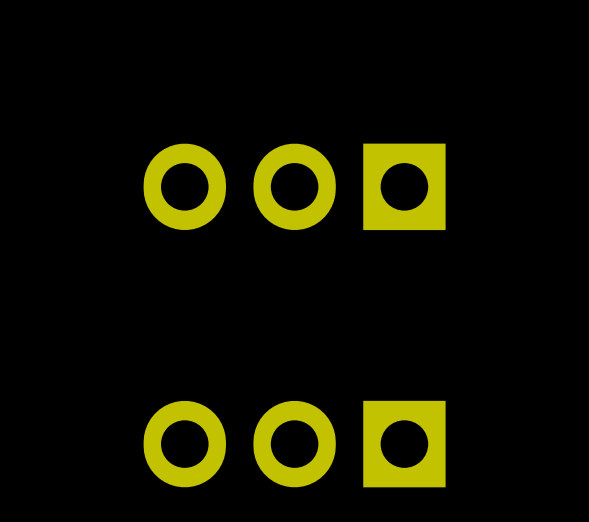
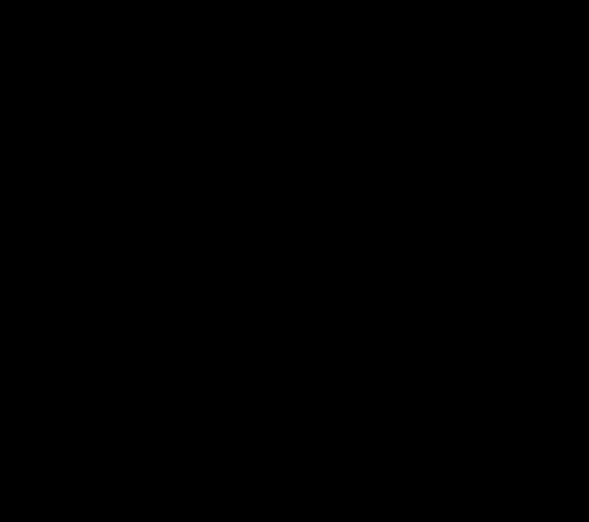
part: (294, 186) -> none
part: (294, 444) -> none

